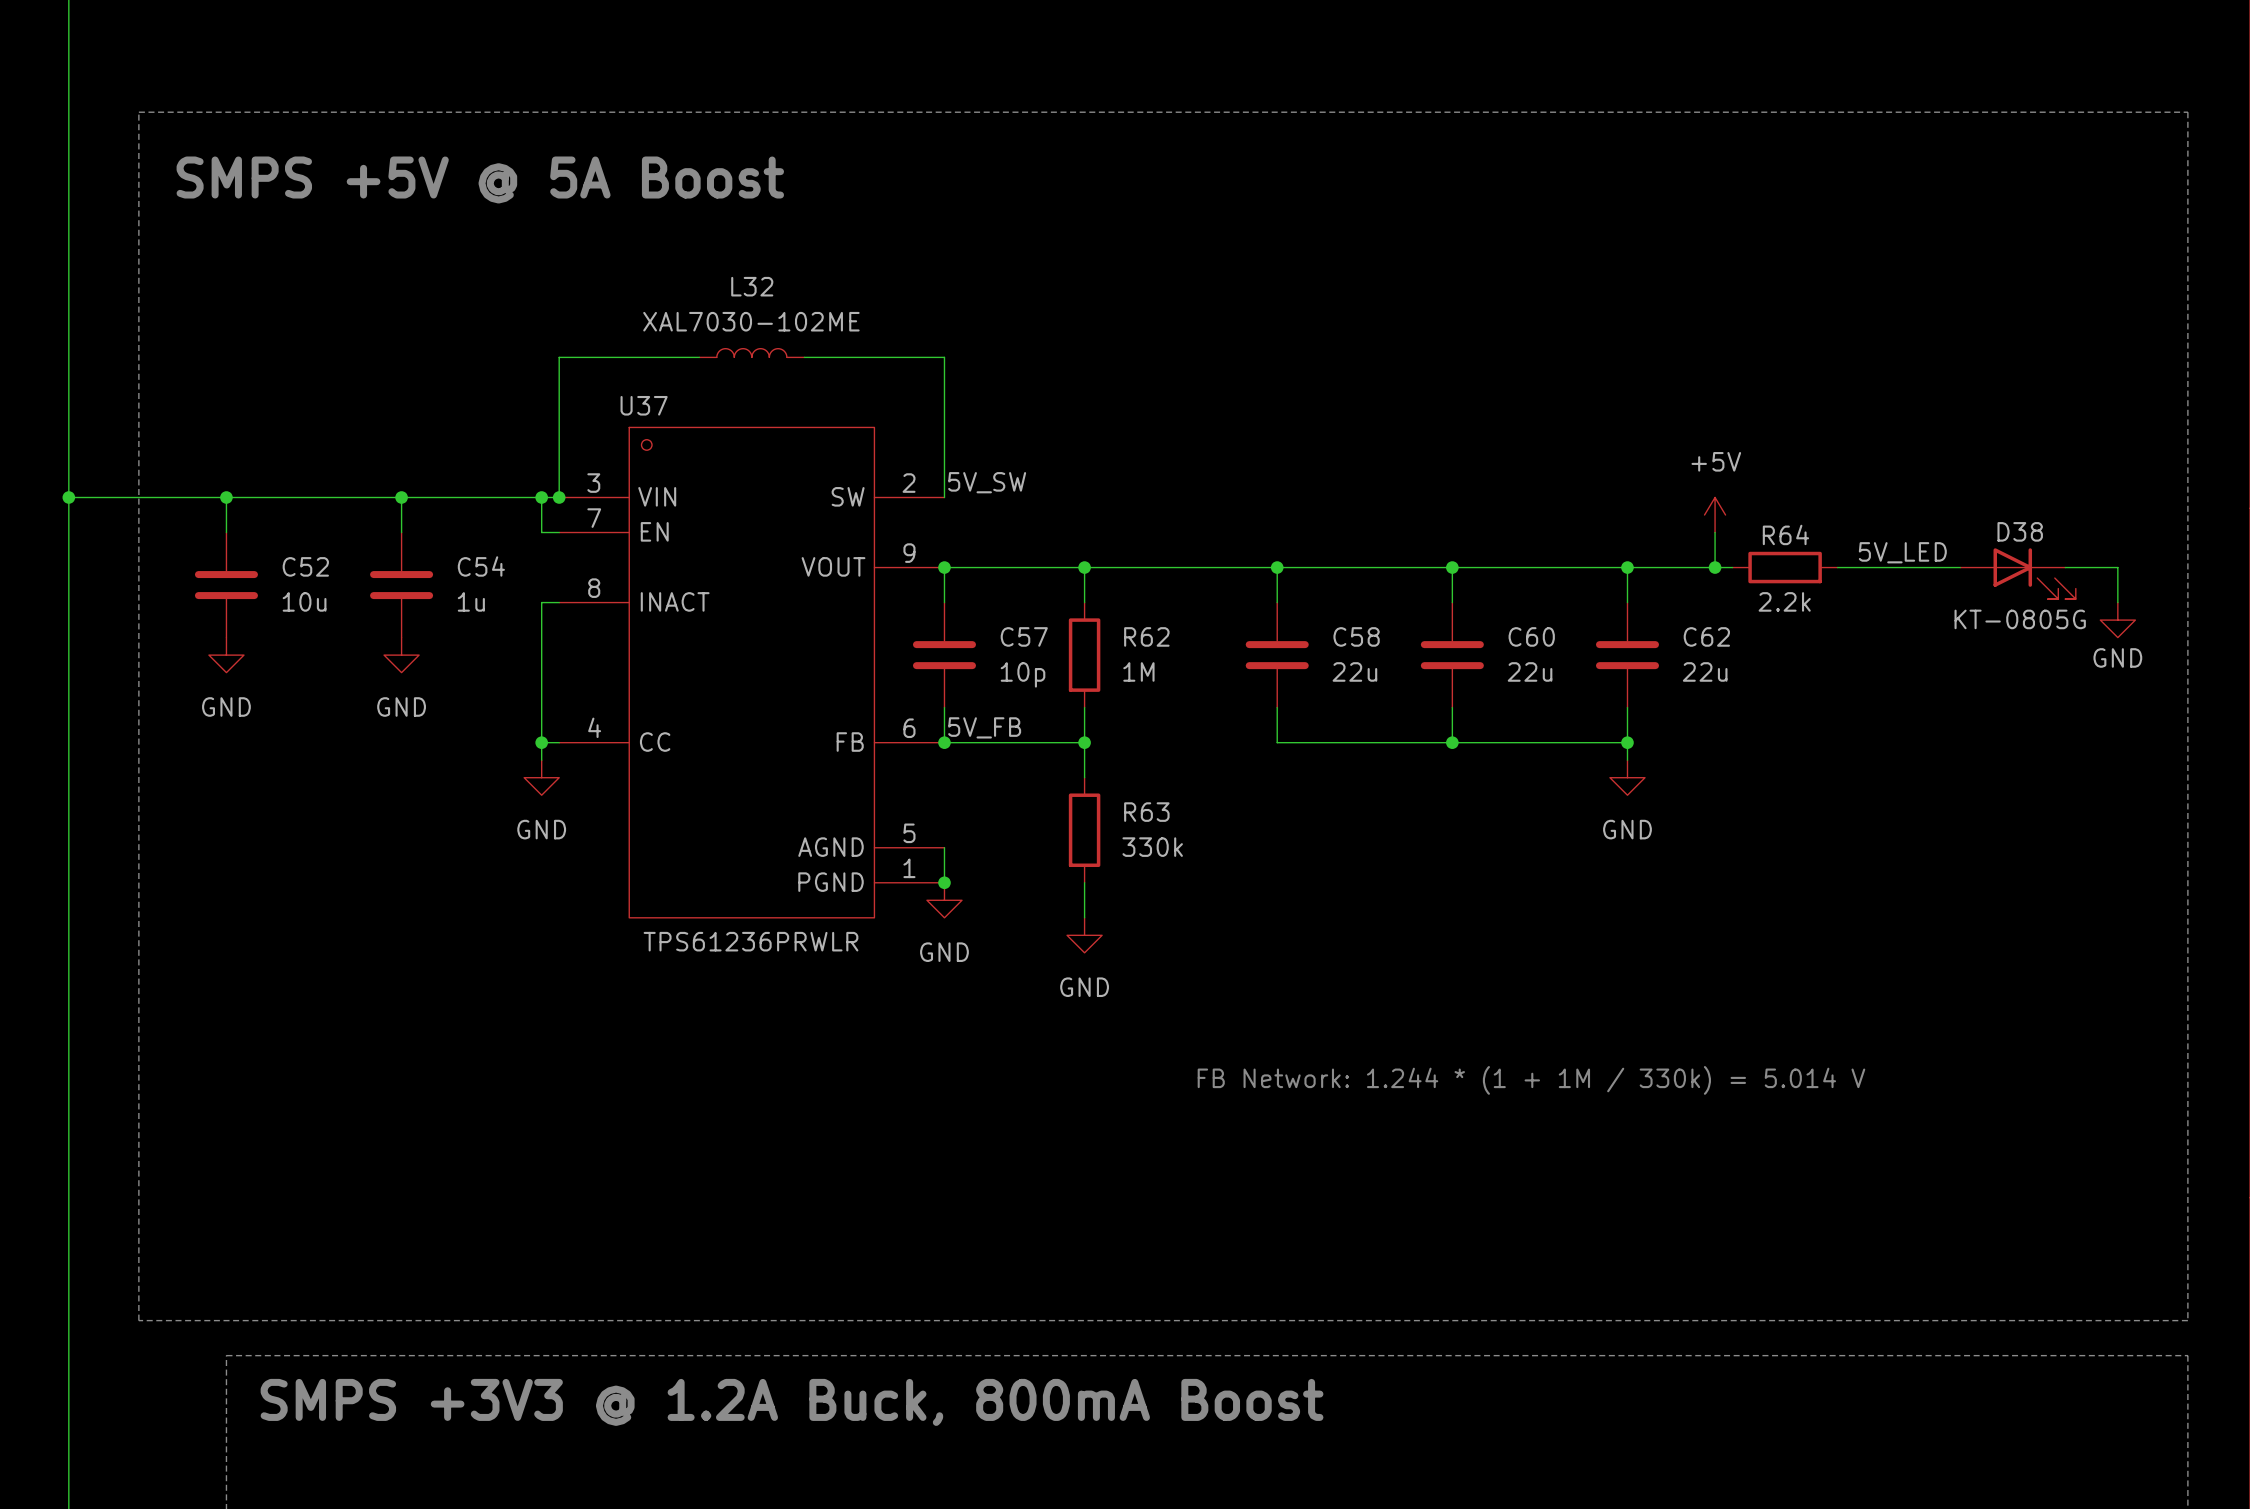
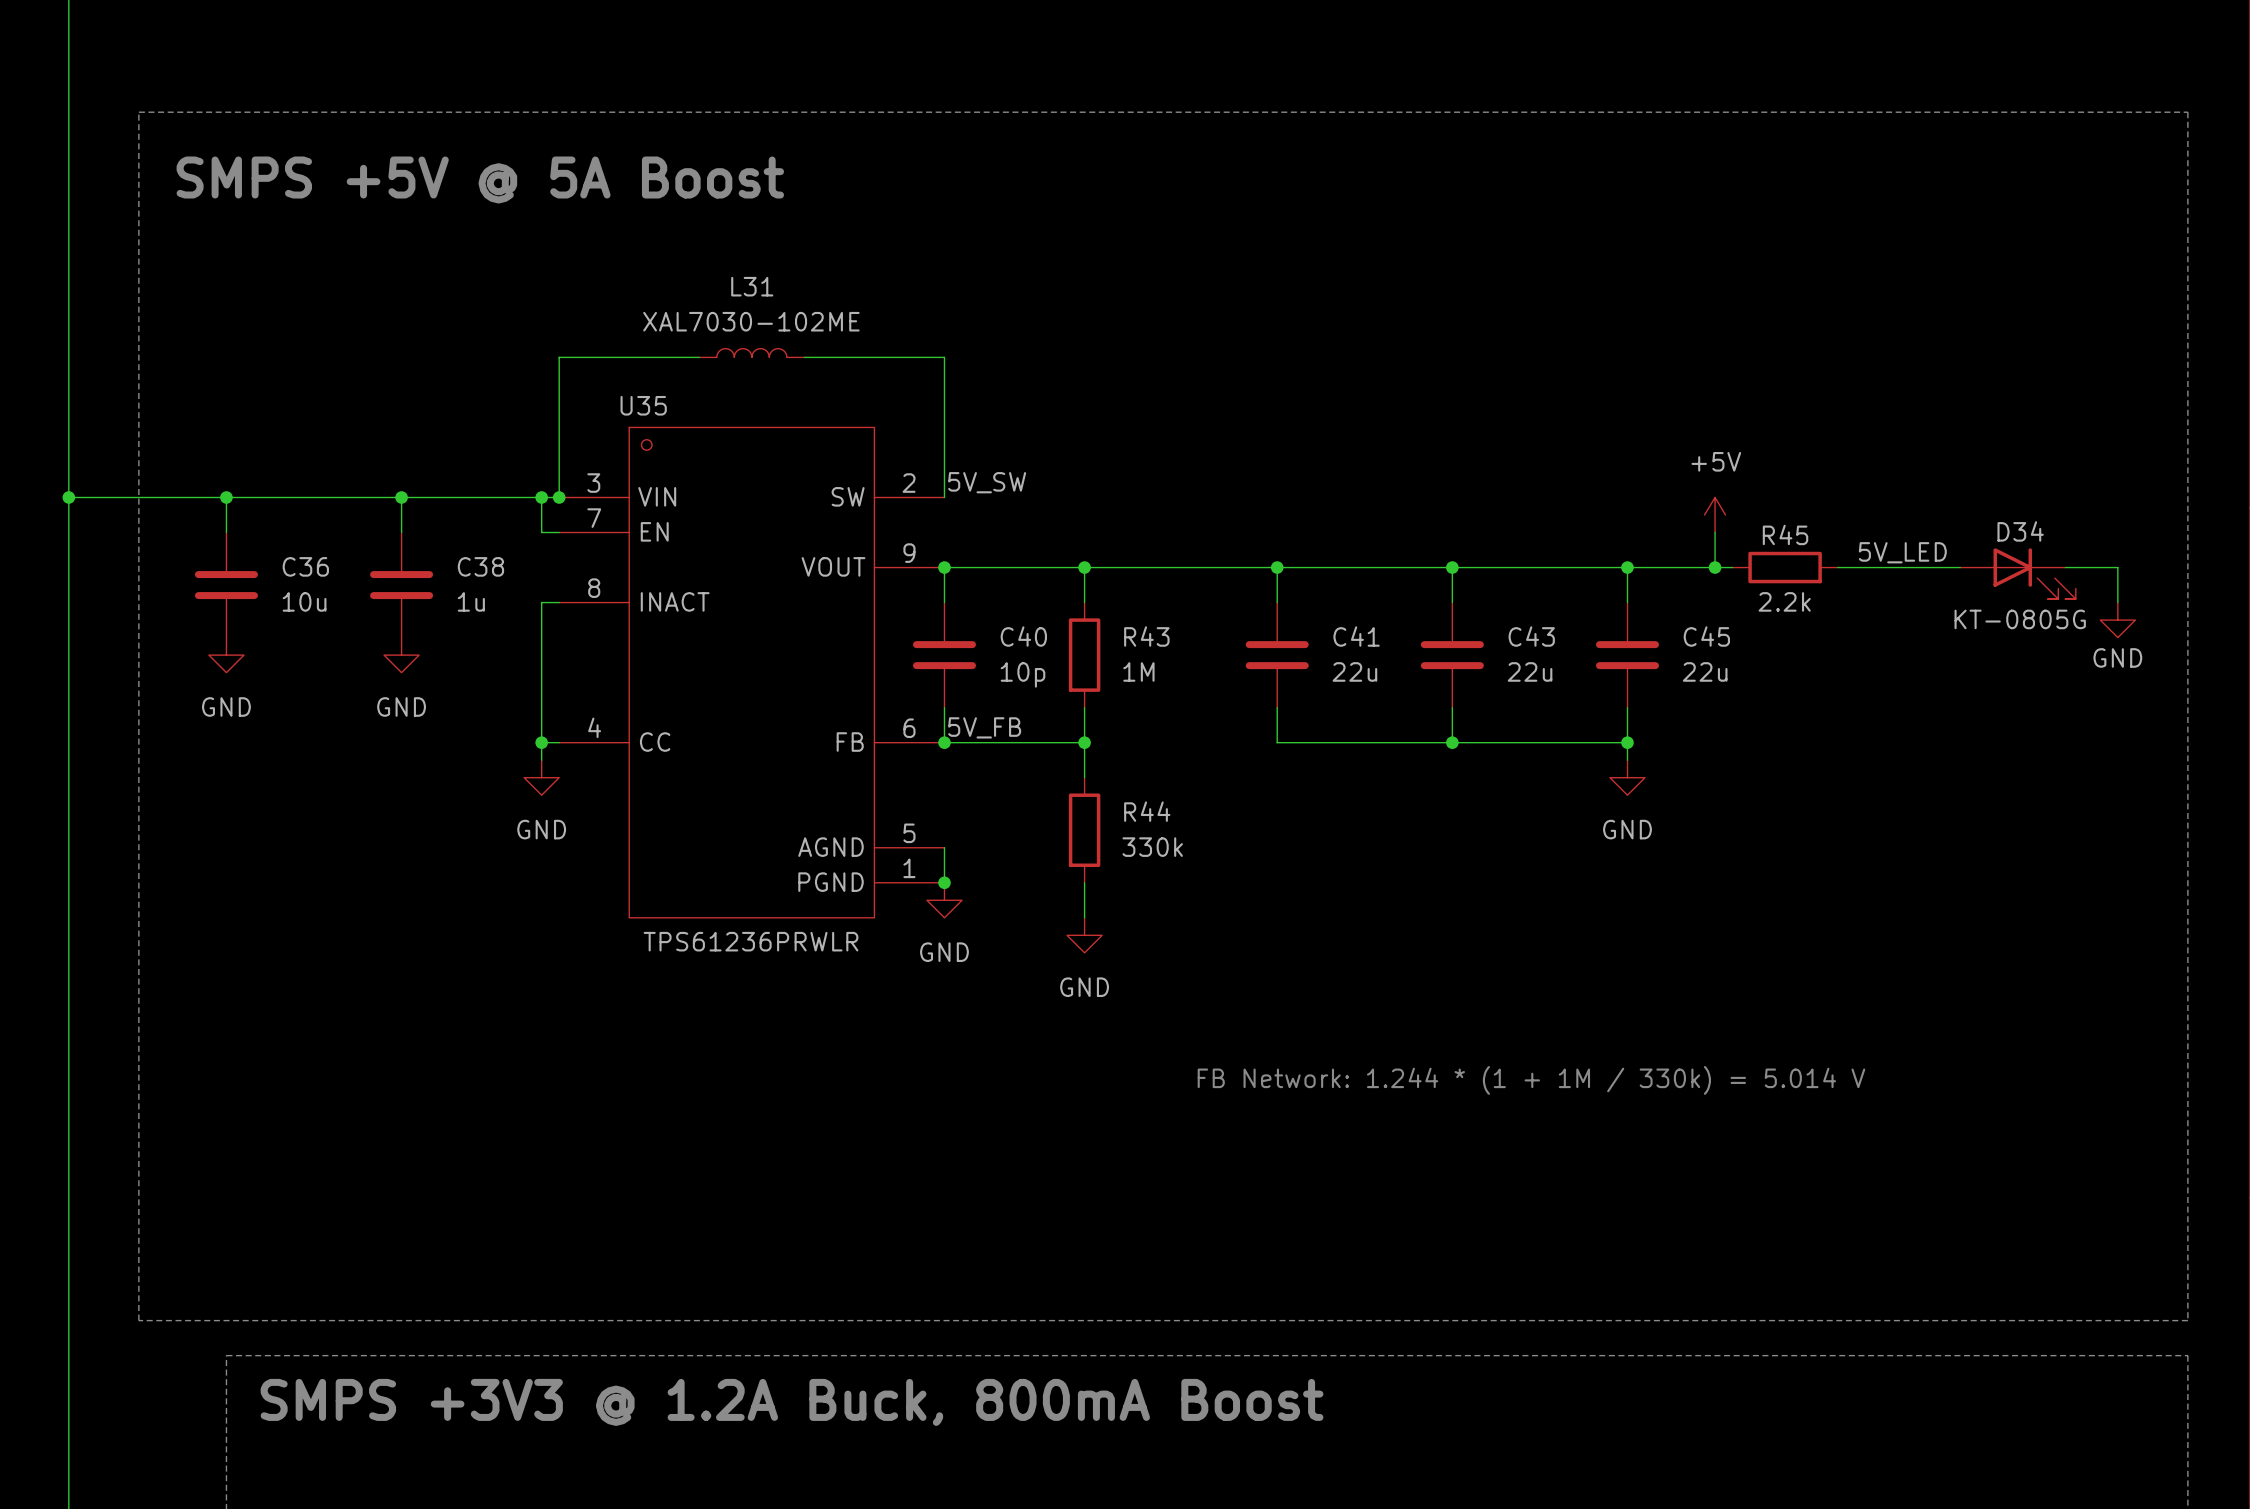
L32 name: L32 (752, 286) -> L31 (752, 286)
U37 name: U37 (644, 405) -> U35 (643, 405)
D38 name: D38 (2020, 531) -> D34 (2020, 531)
R64 name: R64 (1785, 534) -> R45 (1785, 534)
C52 name: C52 (305, 566) -> C36 (305, 566)
C54 name: C54 (481, 566) -> C38 (480, 566)
C57 name: C57 (1024, 636) -> C40 (1023, 636)
R62 name: R62 (1146, 636) -> R43 (1146, 636)
C58 name: C58 (1356, 636) -> C41 (1356, 636)
C60 name: C60 (1531, 636) -> C43 (1531, 636)
C62 name: C62 (1706, 636) -> C45 (1706, 636)
R63 name: R63 (1146, 812) -> R44 (1147, 811)

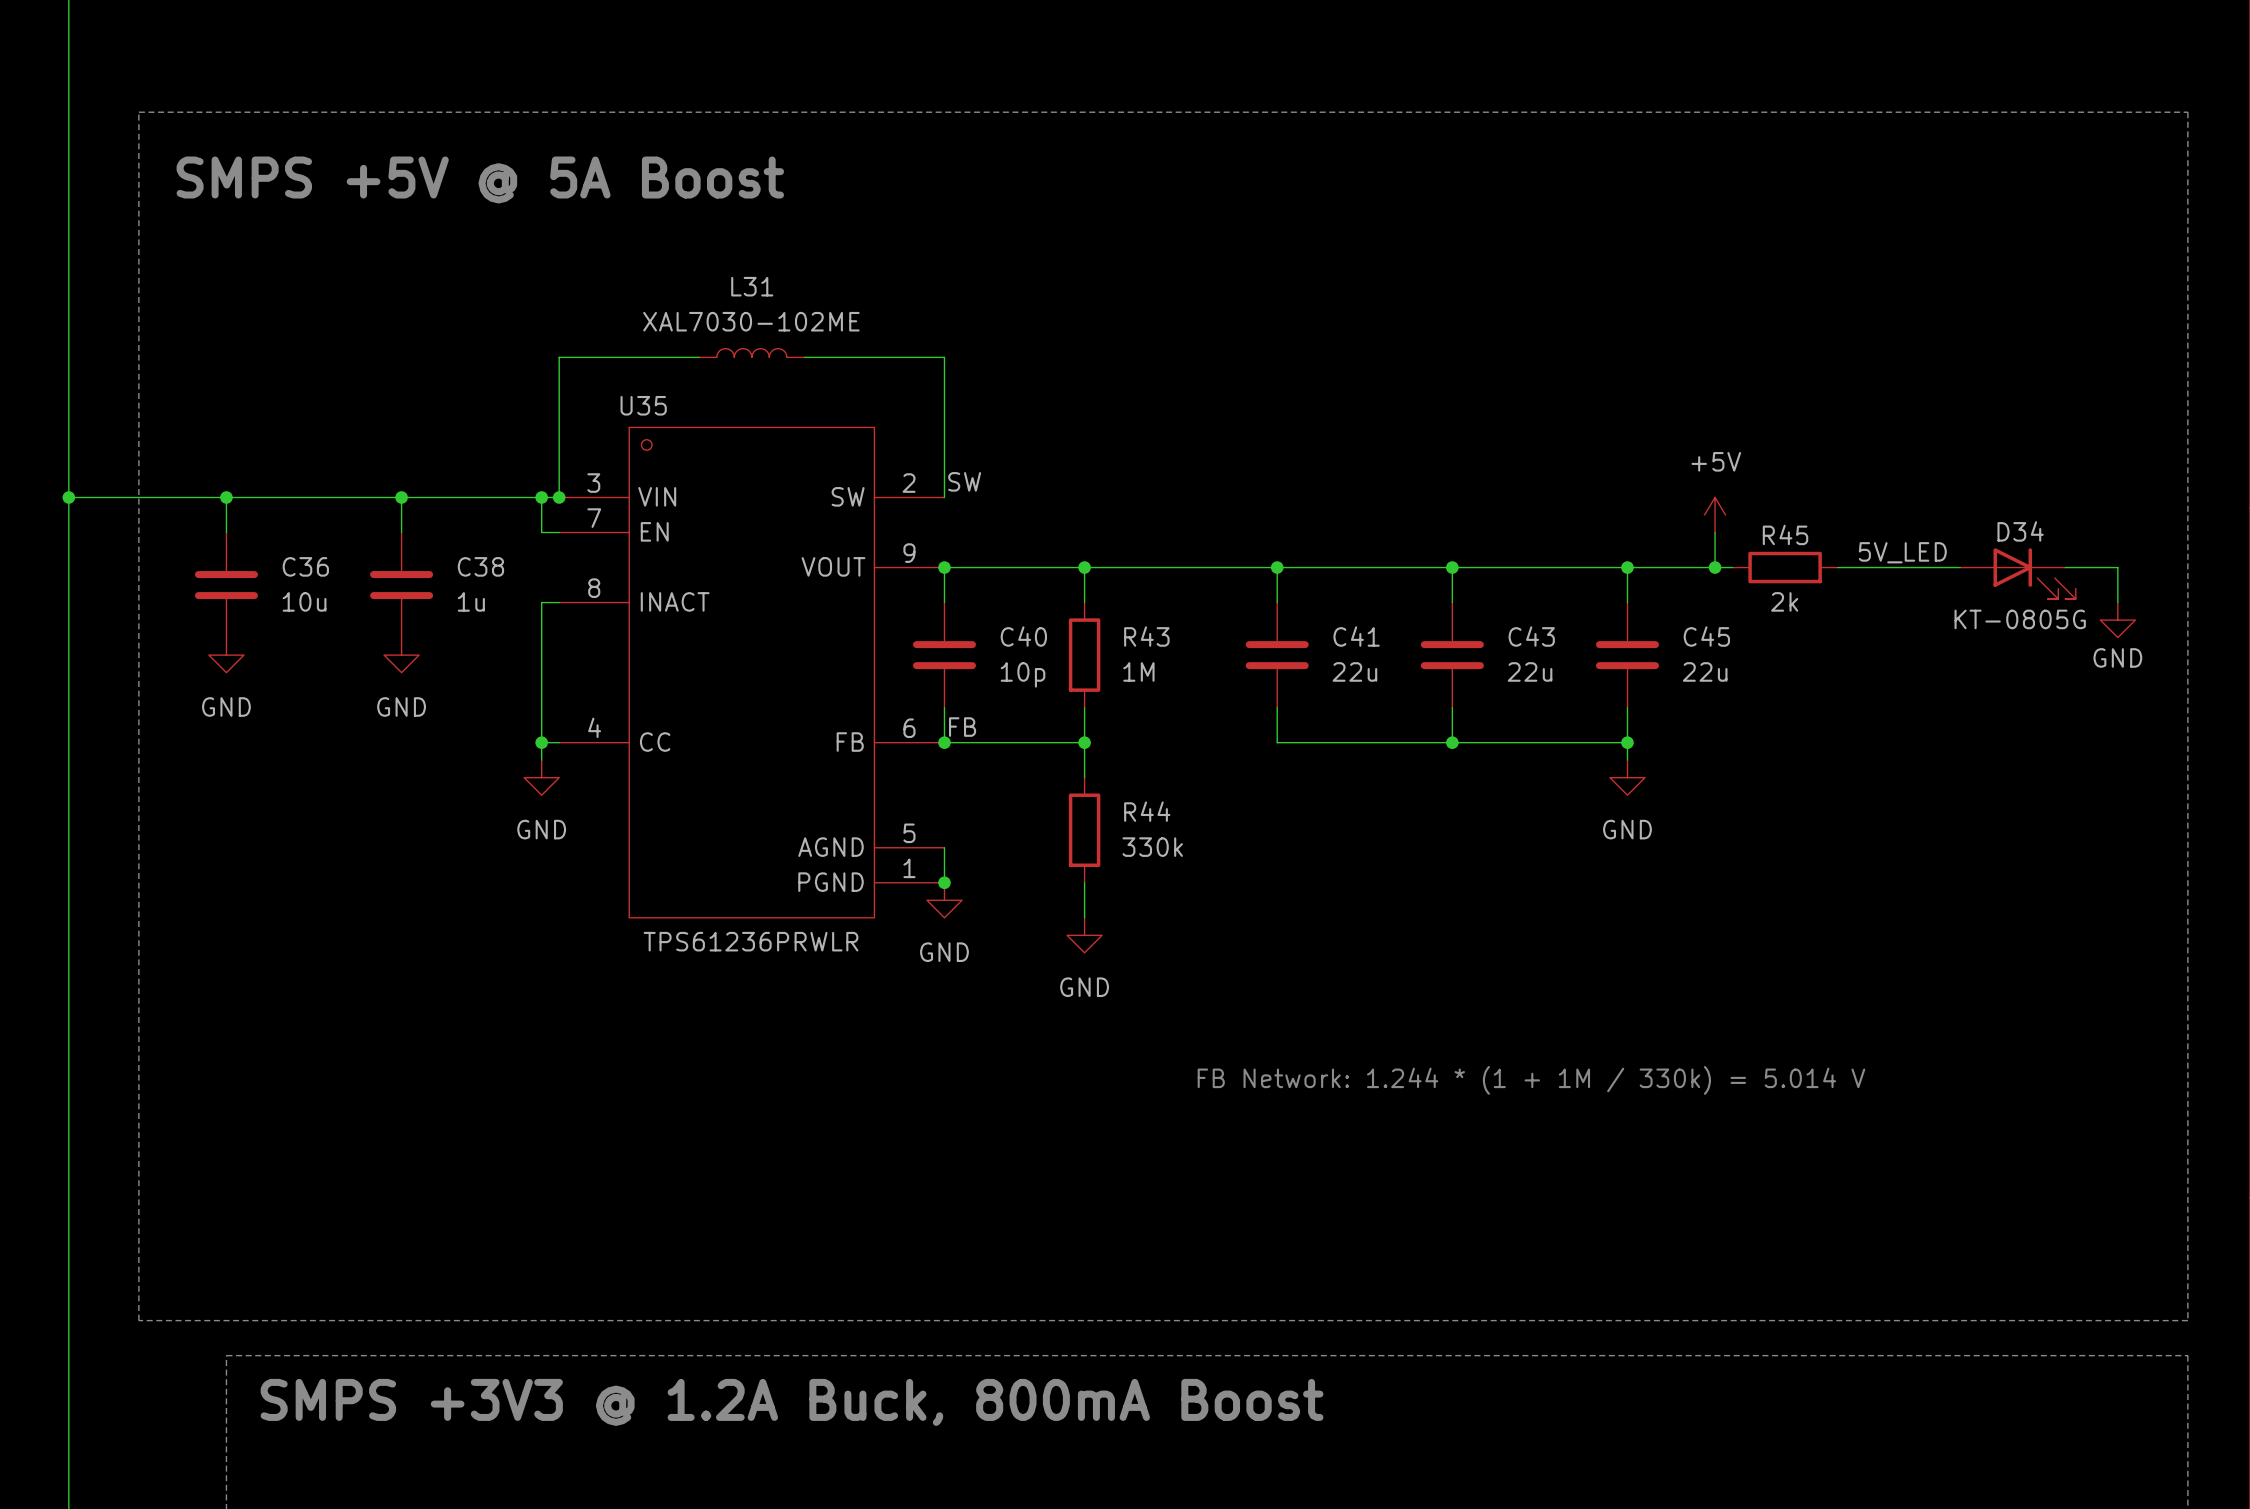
label: 5V_SW (987, 482) -> SW (964, 481)
R45 value: 2.2k (1784, 601) -> 2k (1784, 601)
label: 5V_FB (984, 727) -> FB (962, 727)

